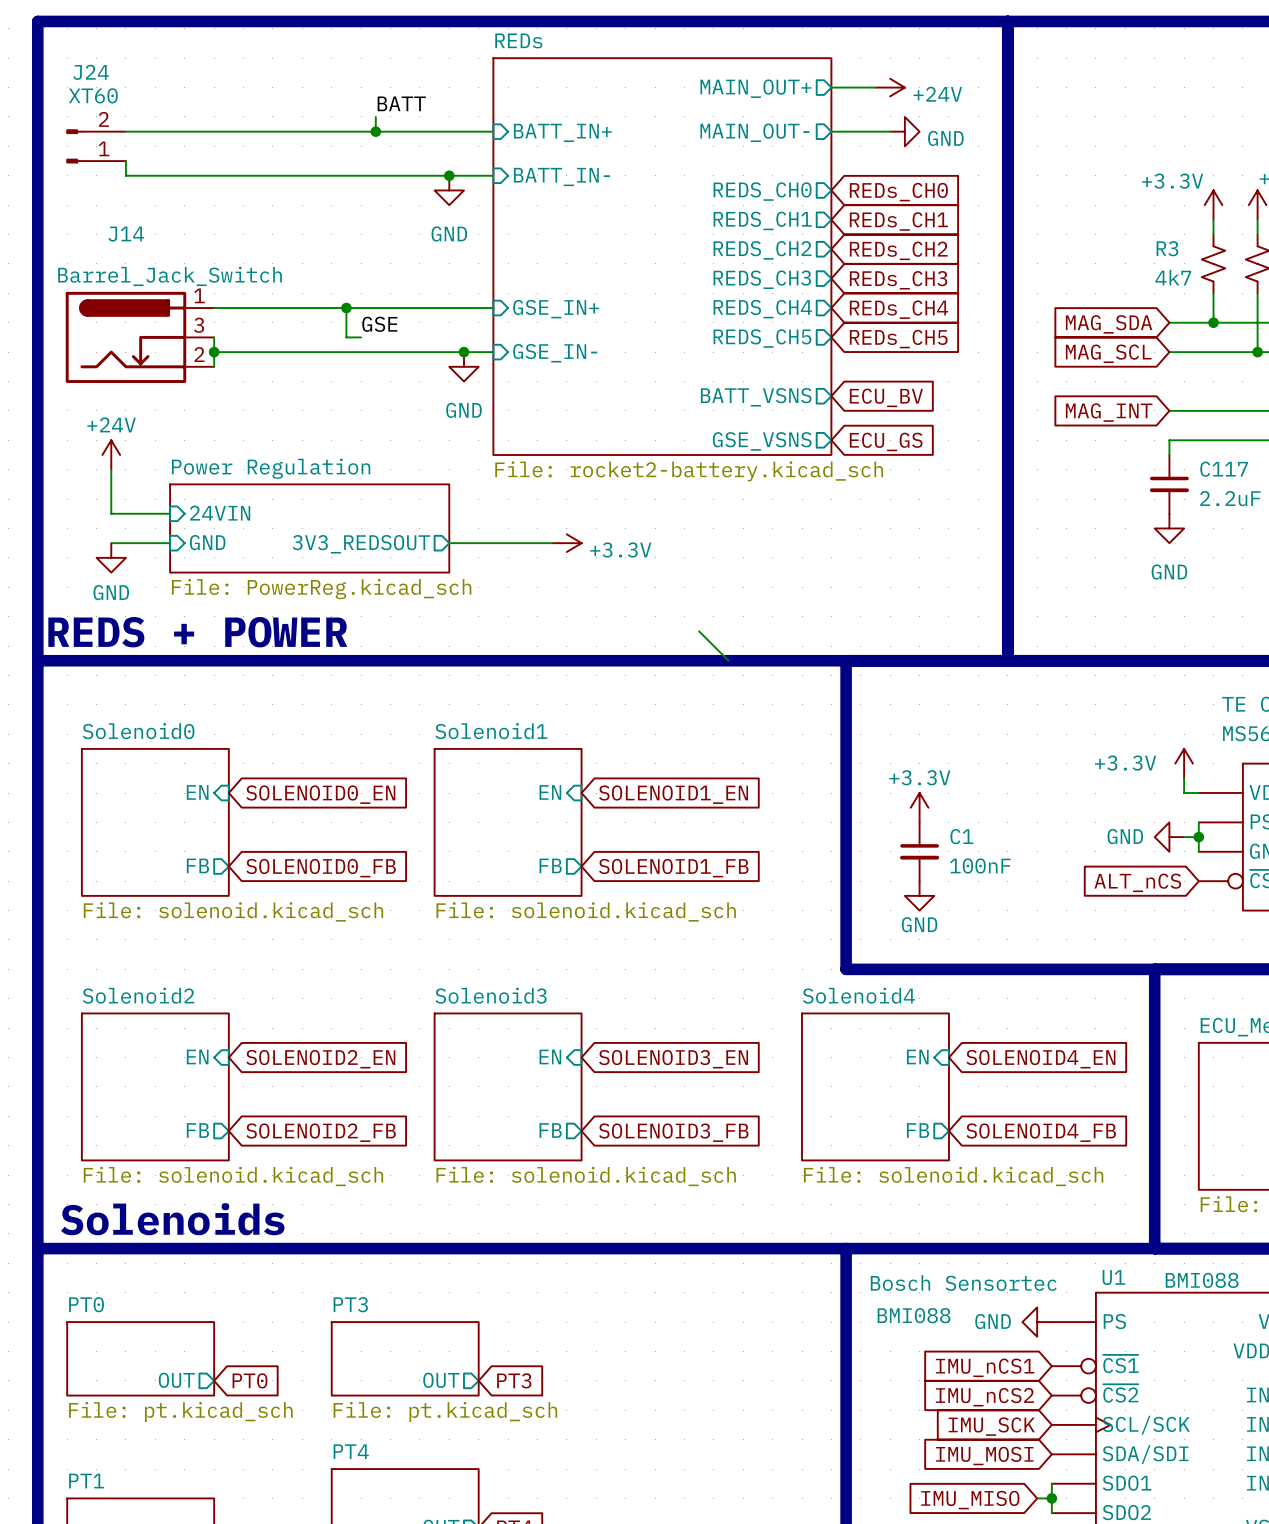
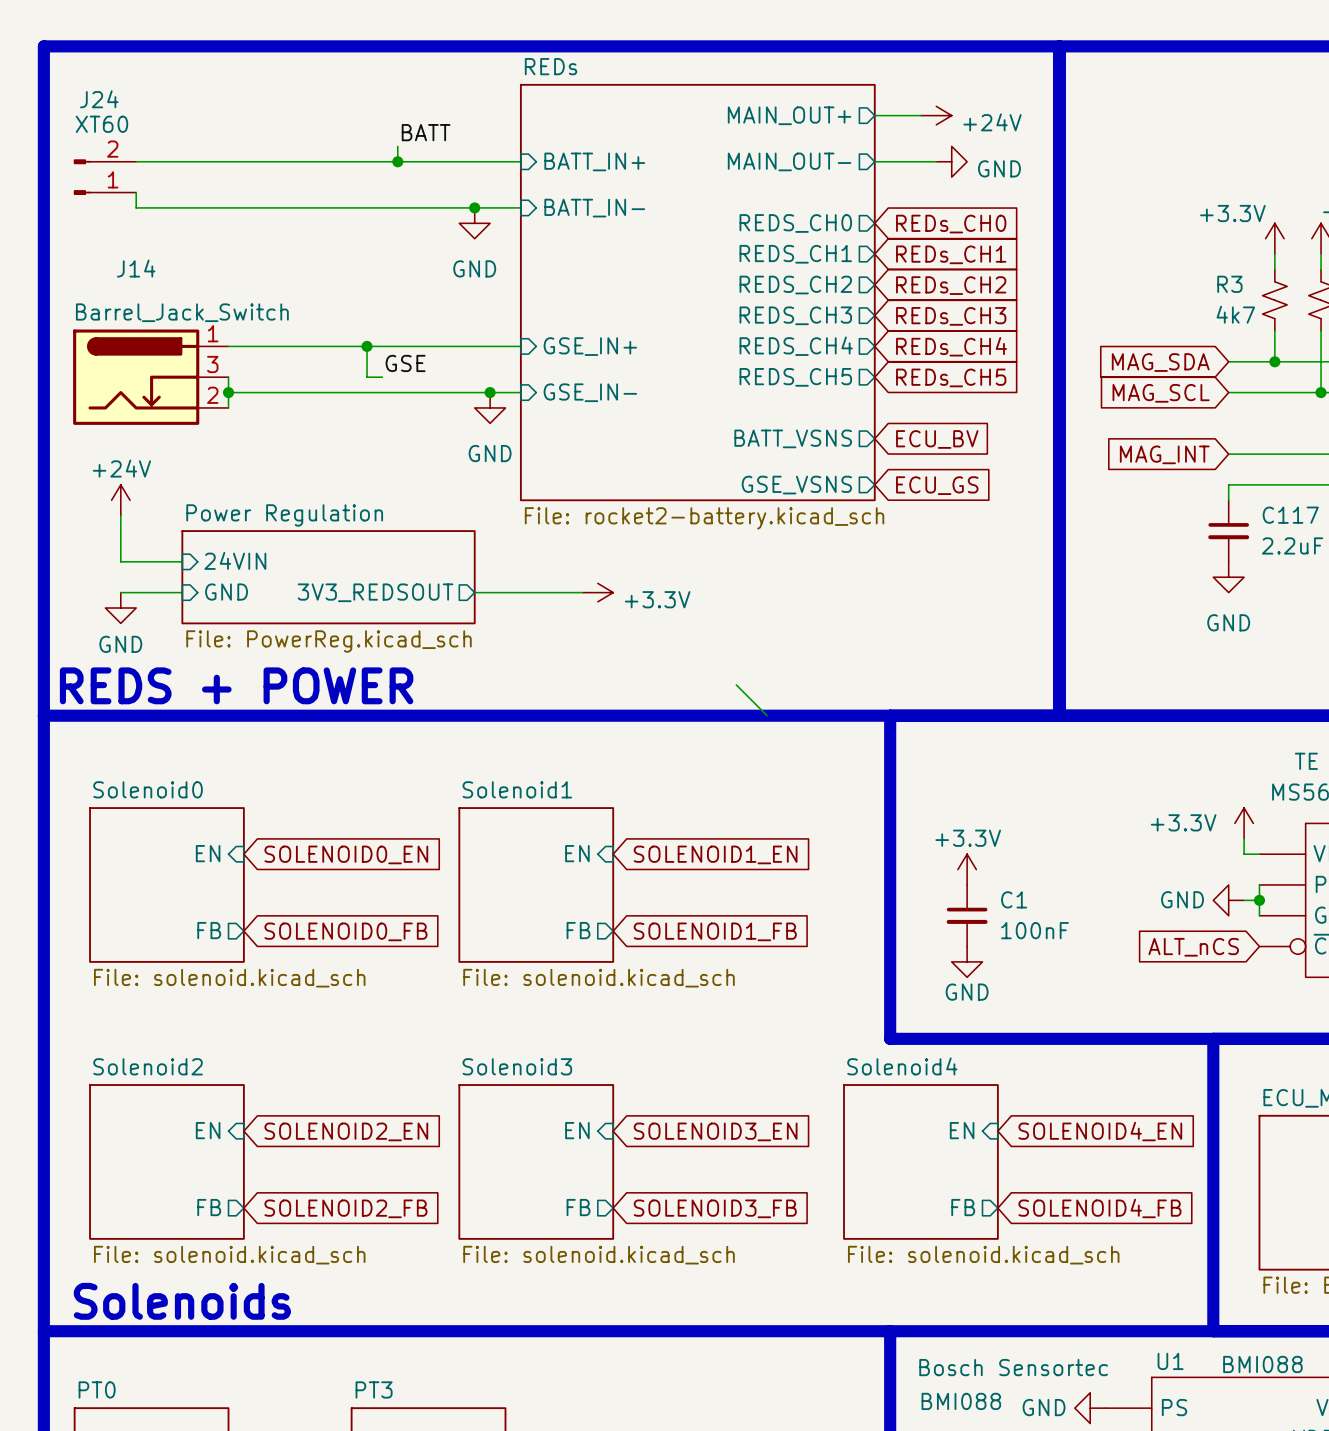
J14 symbol: [65, 291, 215, 383] -> [73, 329, 229, 425]

